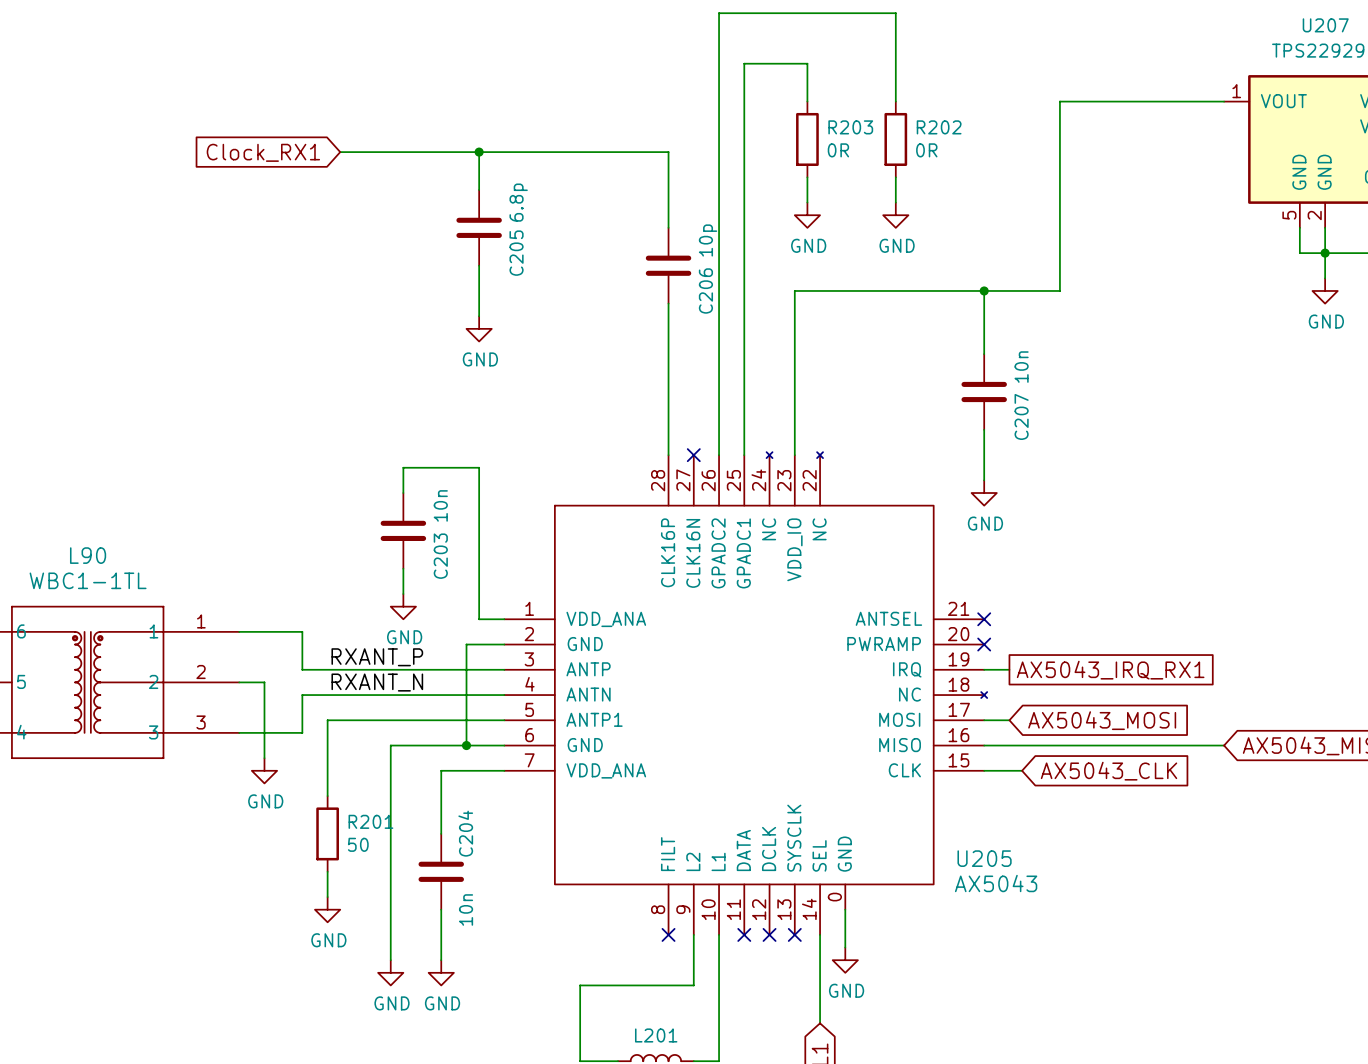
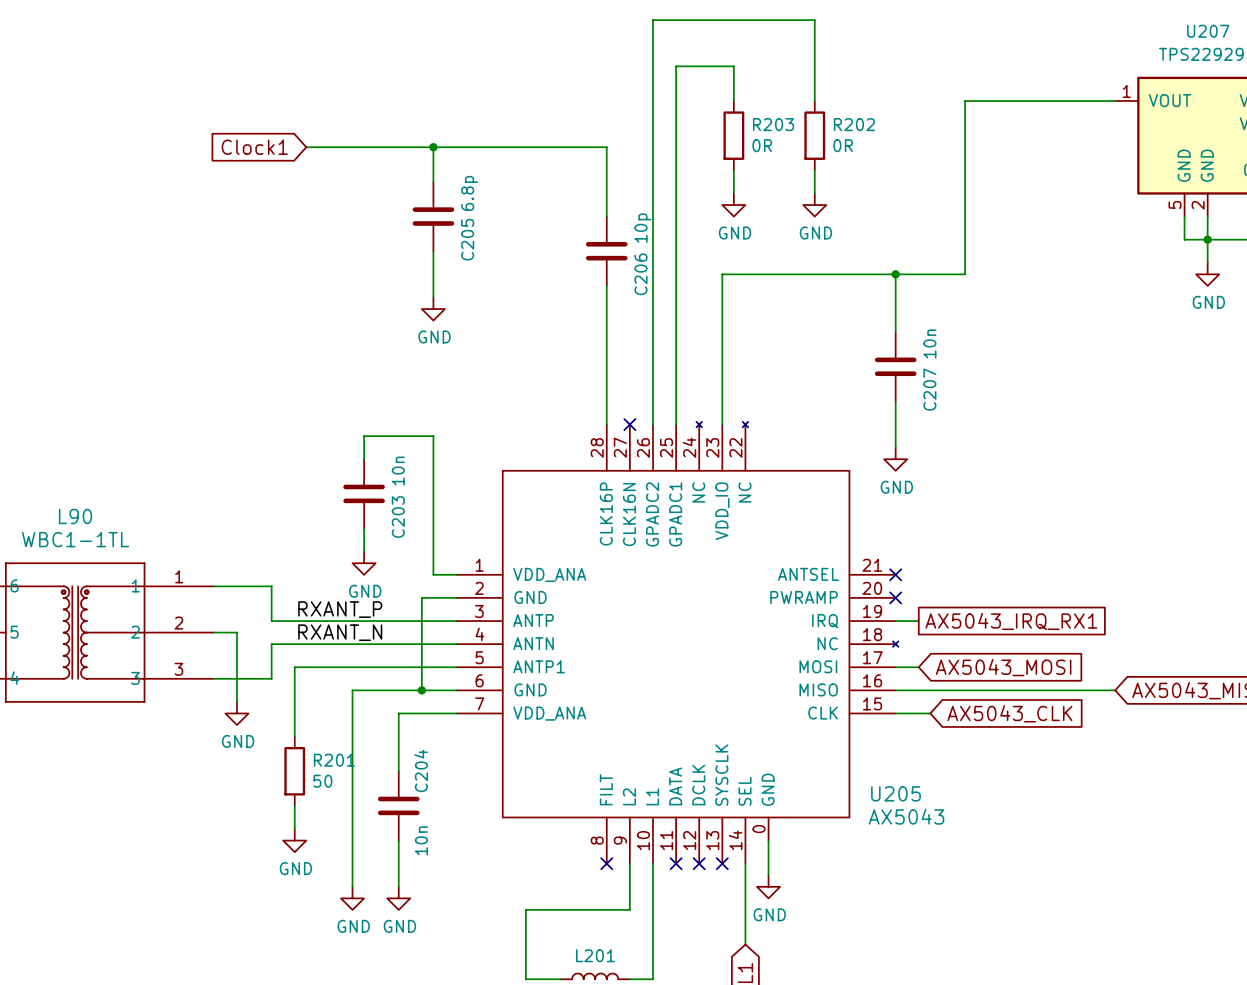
global label: Clock_RX1 (263, 152) -> Clock1 (254, 147)

